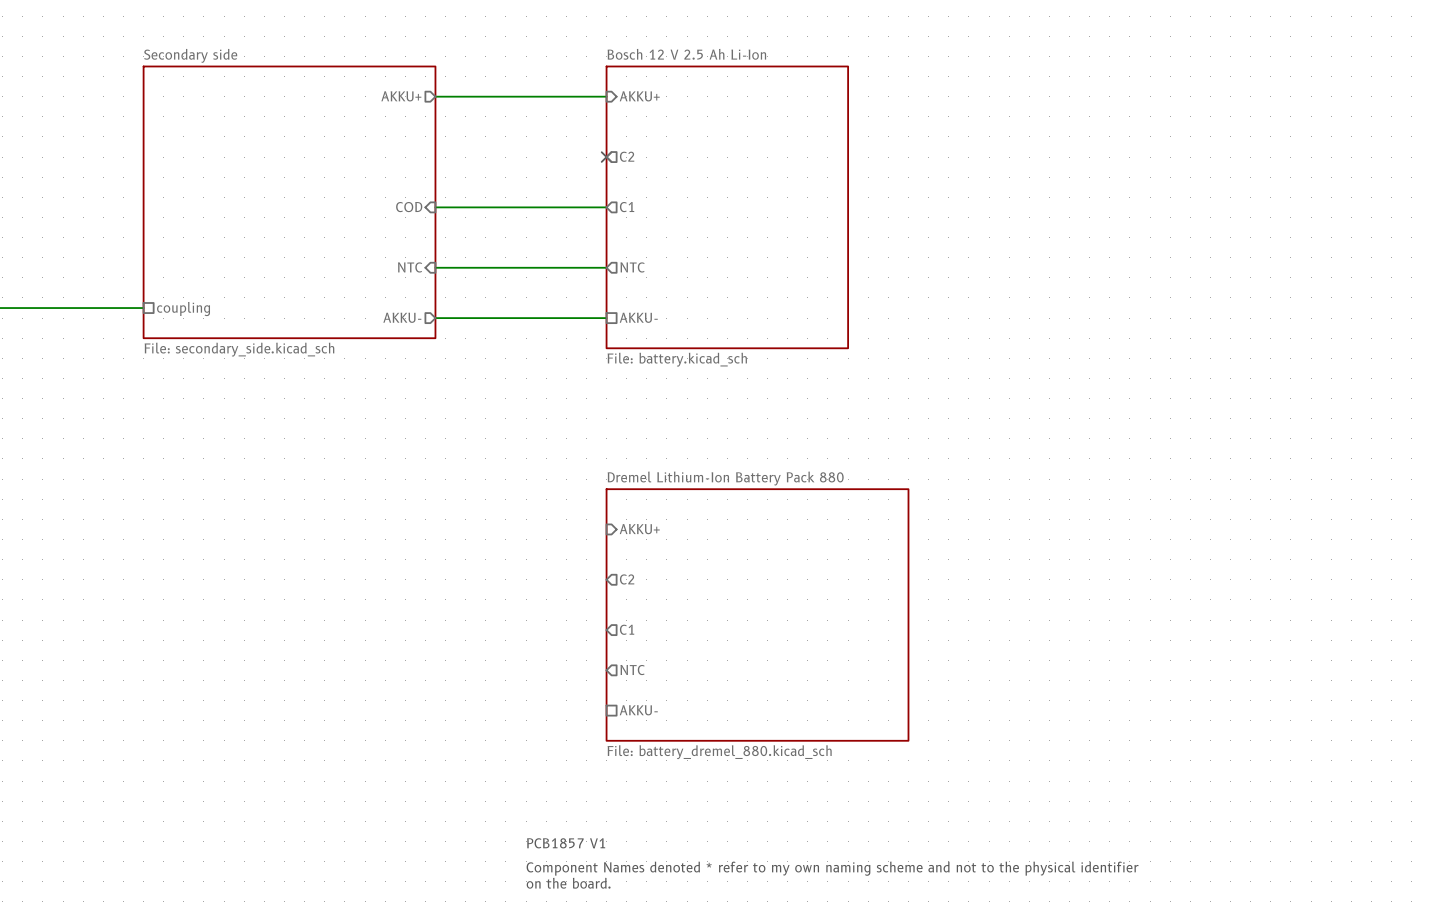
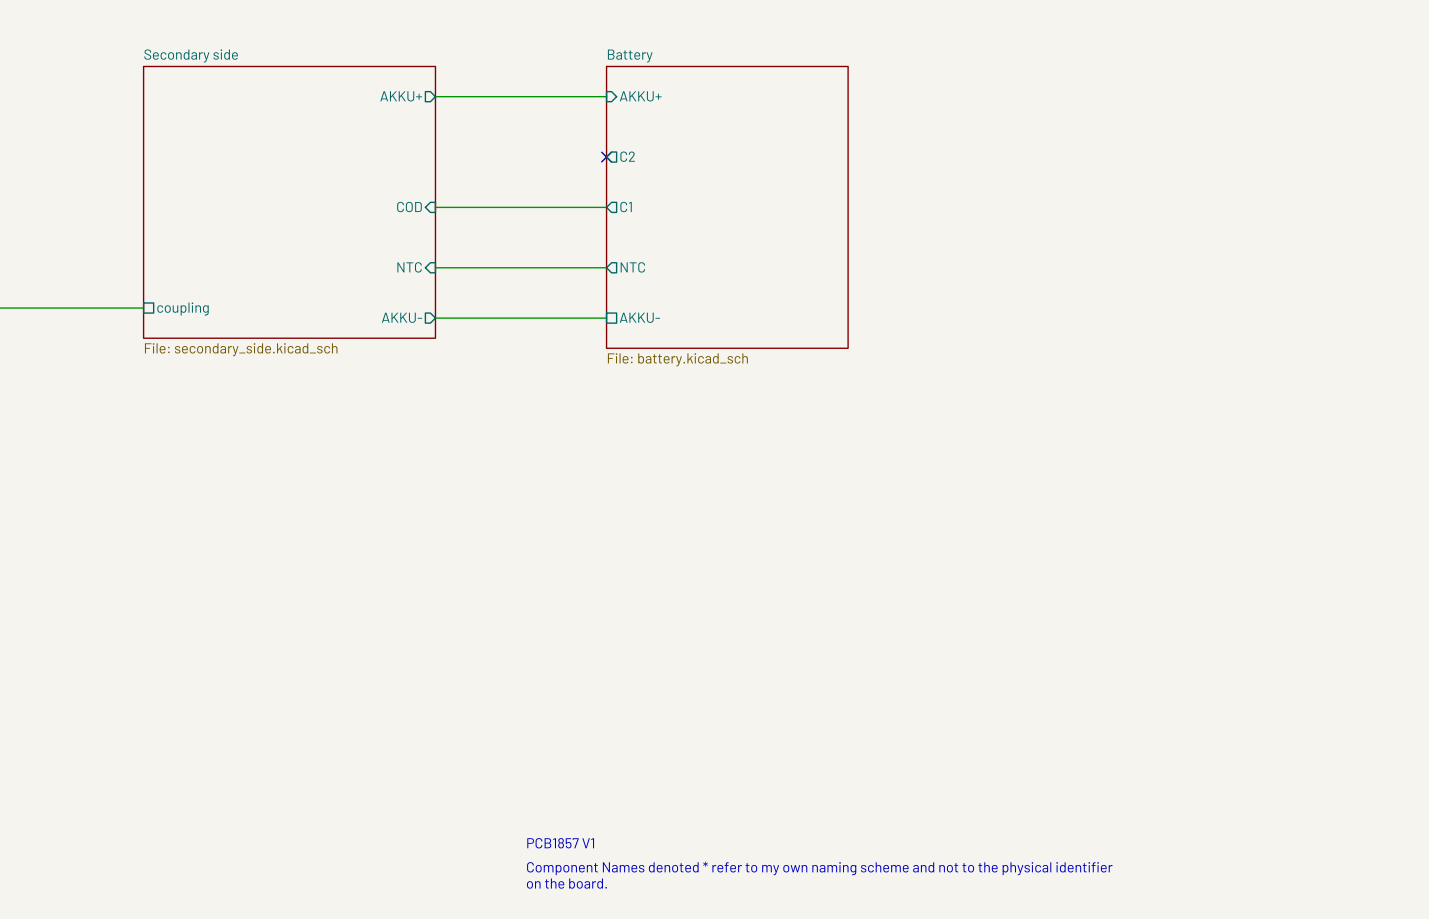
sheet Bosch 12 V 2.5 Ah Li-Ion name: Bosch 12 V 2.5 Ah Li-Ion (686, 54) -> Battery (630, 56)
sheet pin: AKKU+ (639, 529) -> none
sheet pin: C2 (627, 579) -> none
sheet Dremel Lithium-Ion Battery Pack 880: File: battery_dremel_880.kicad_sch (757, 614) -> none
sheet pin: C1 (627, 629) -> none
sheet pin: NTC (632, 670) -> none
sheet pin: AKKU- (638, 710) -> none

